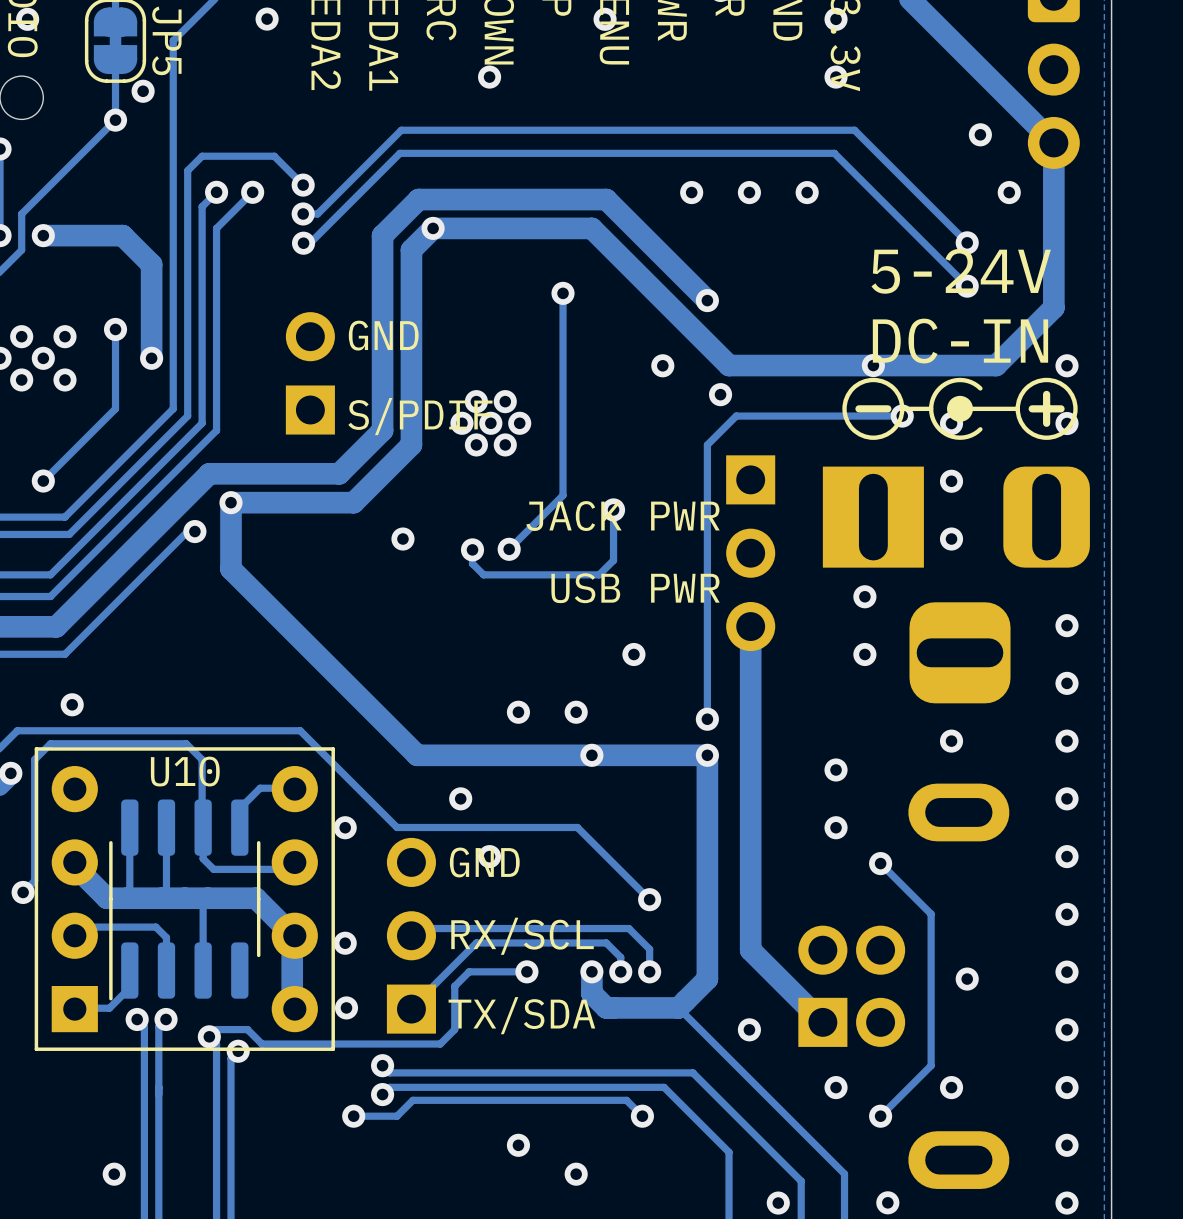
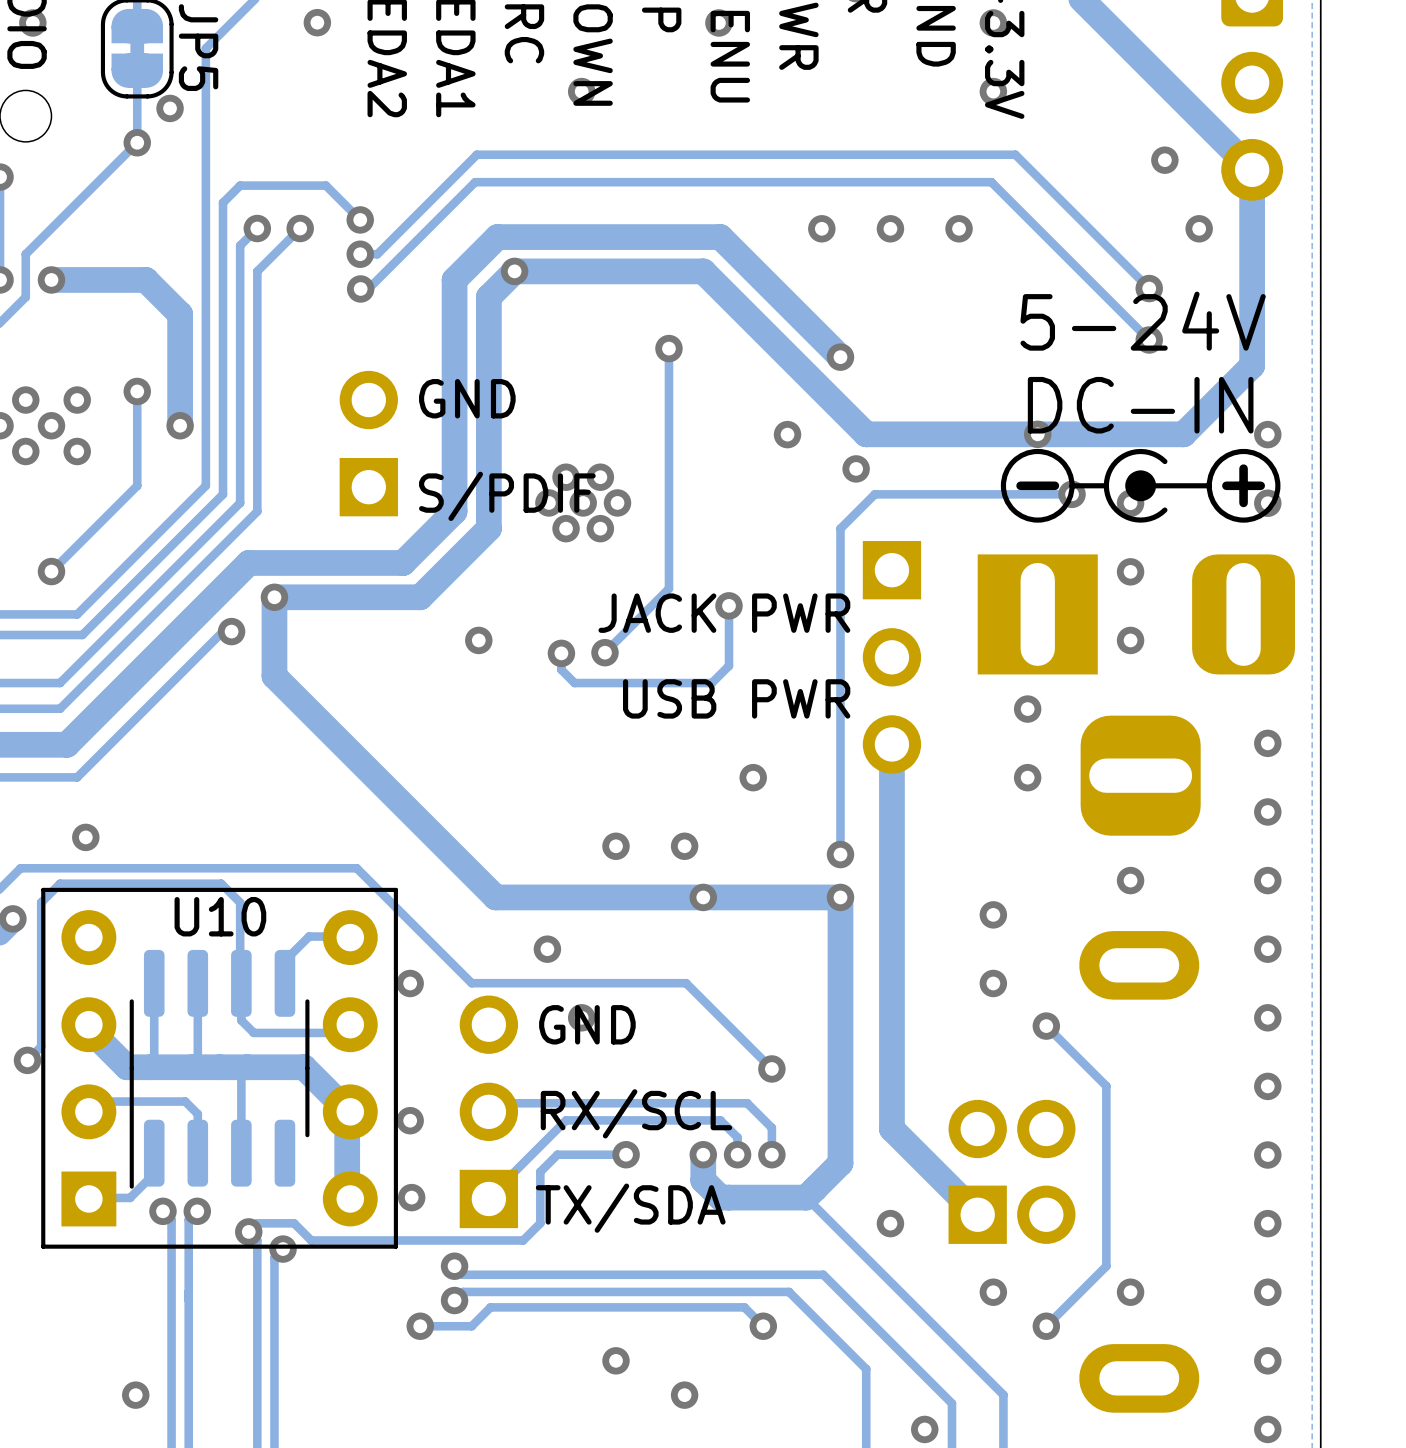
via: (967, 979) -> none
via: (887, 1202) -> none

